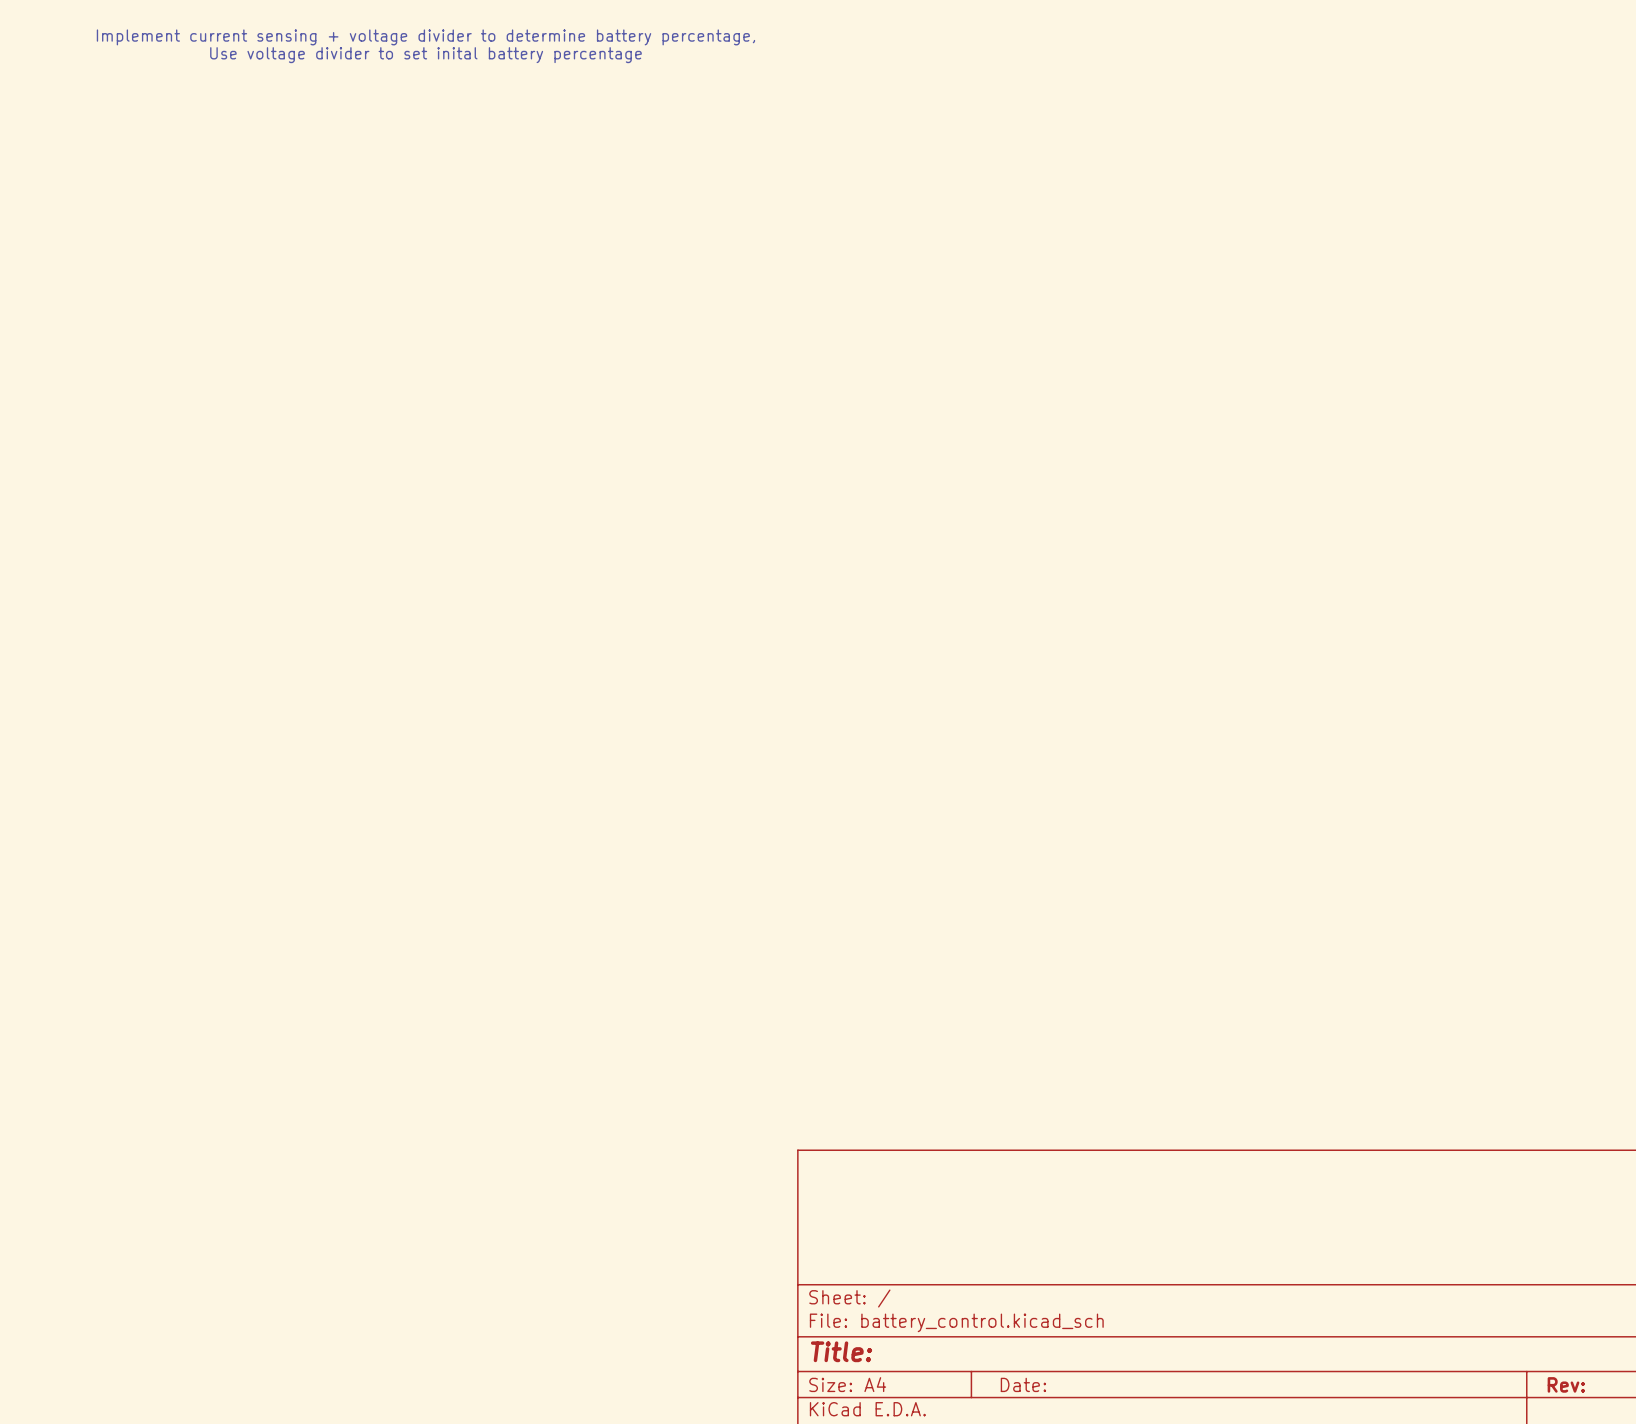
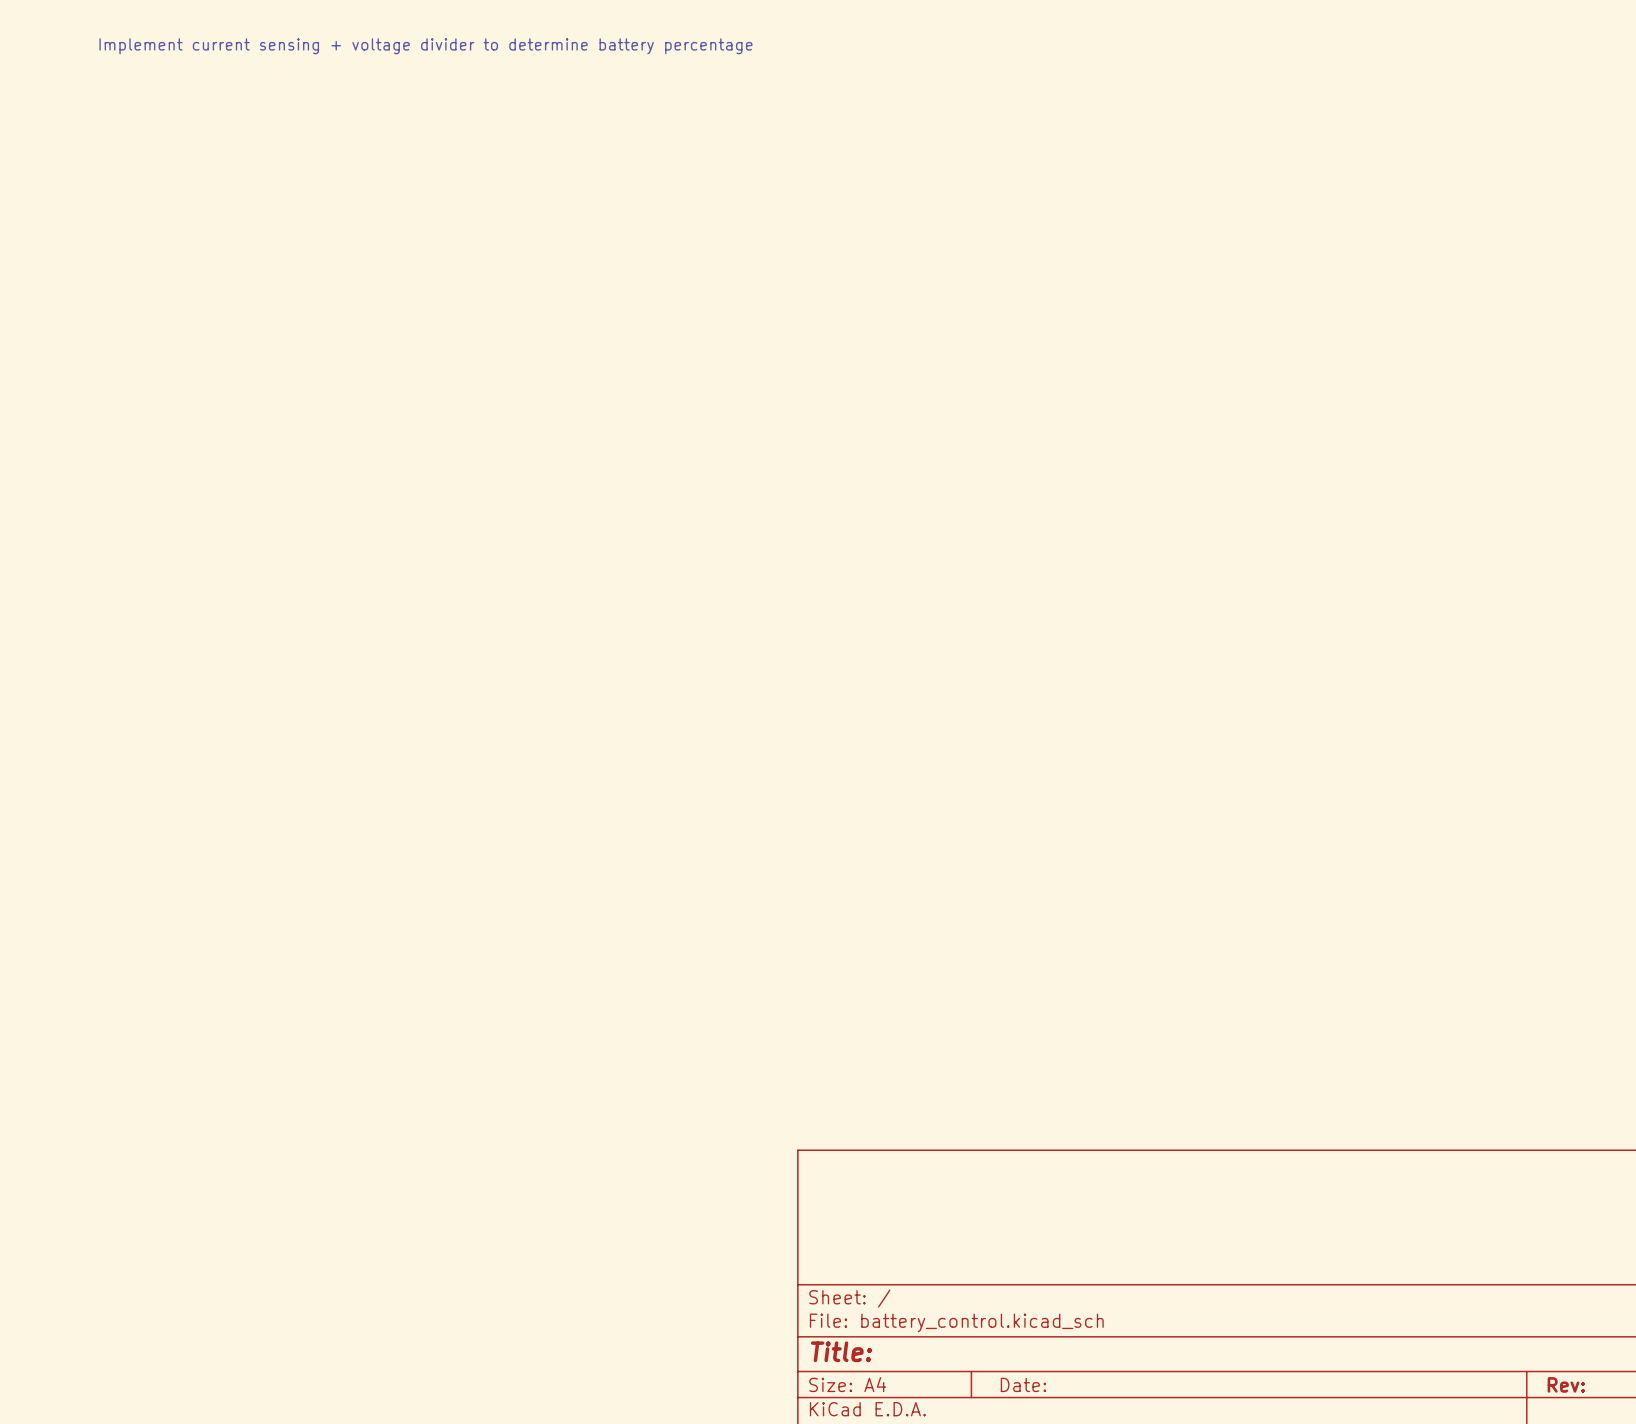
text: Implement current sensing + voltage divider to determine battery percentage, (425, 37) -> none
text: none -> Implement current sensing + voltage divider to determine battery percentage (425, 46)
text: Use voltage divider to set inital battery percentage (425, 55) -> none

